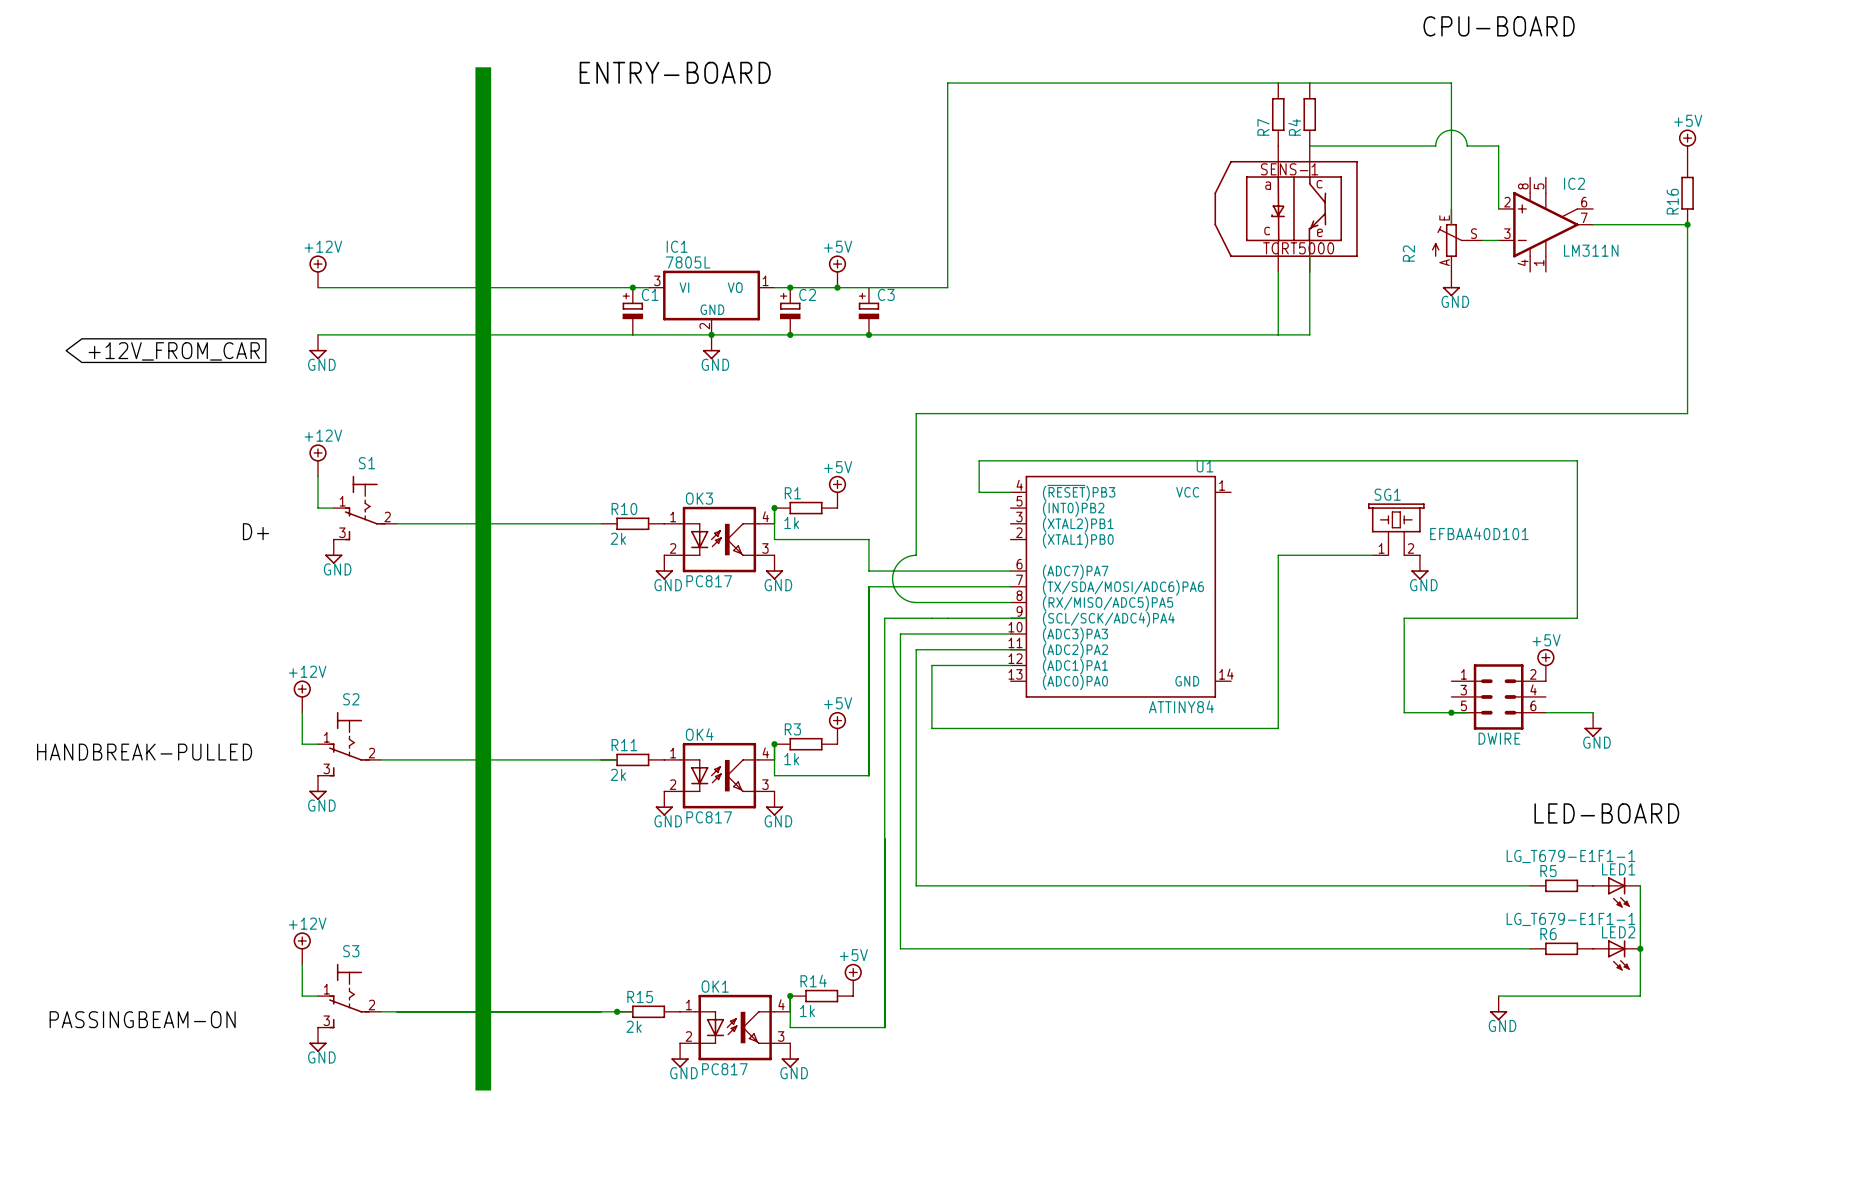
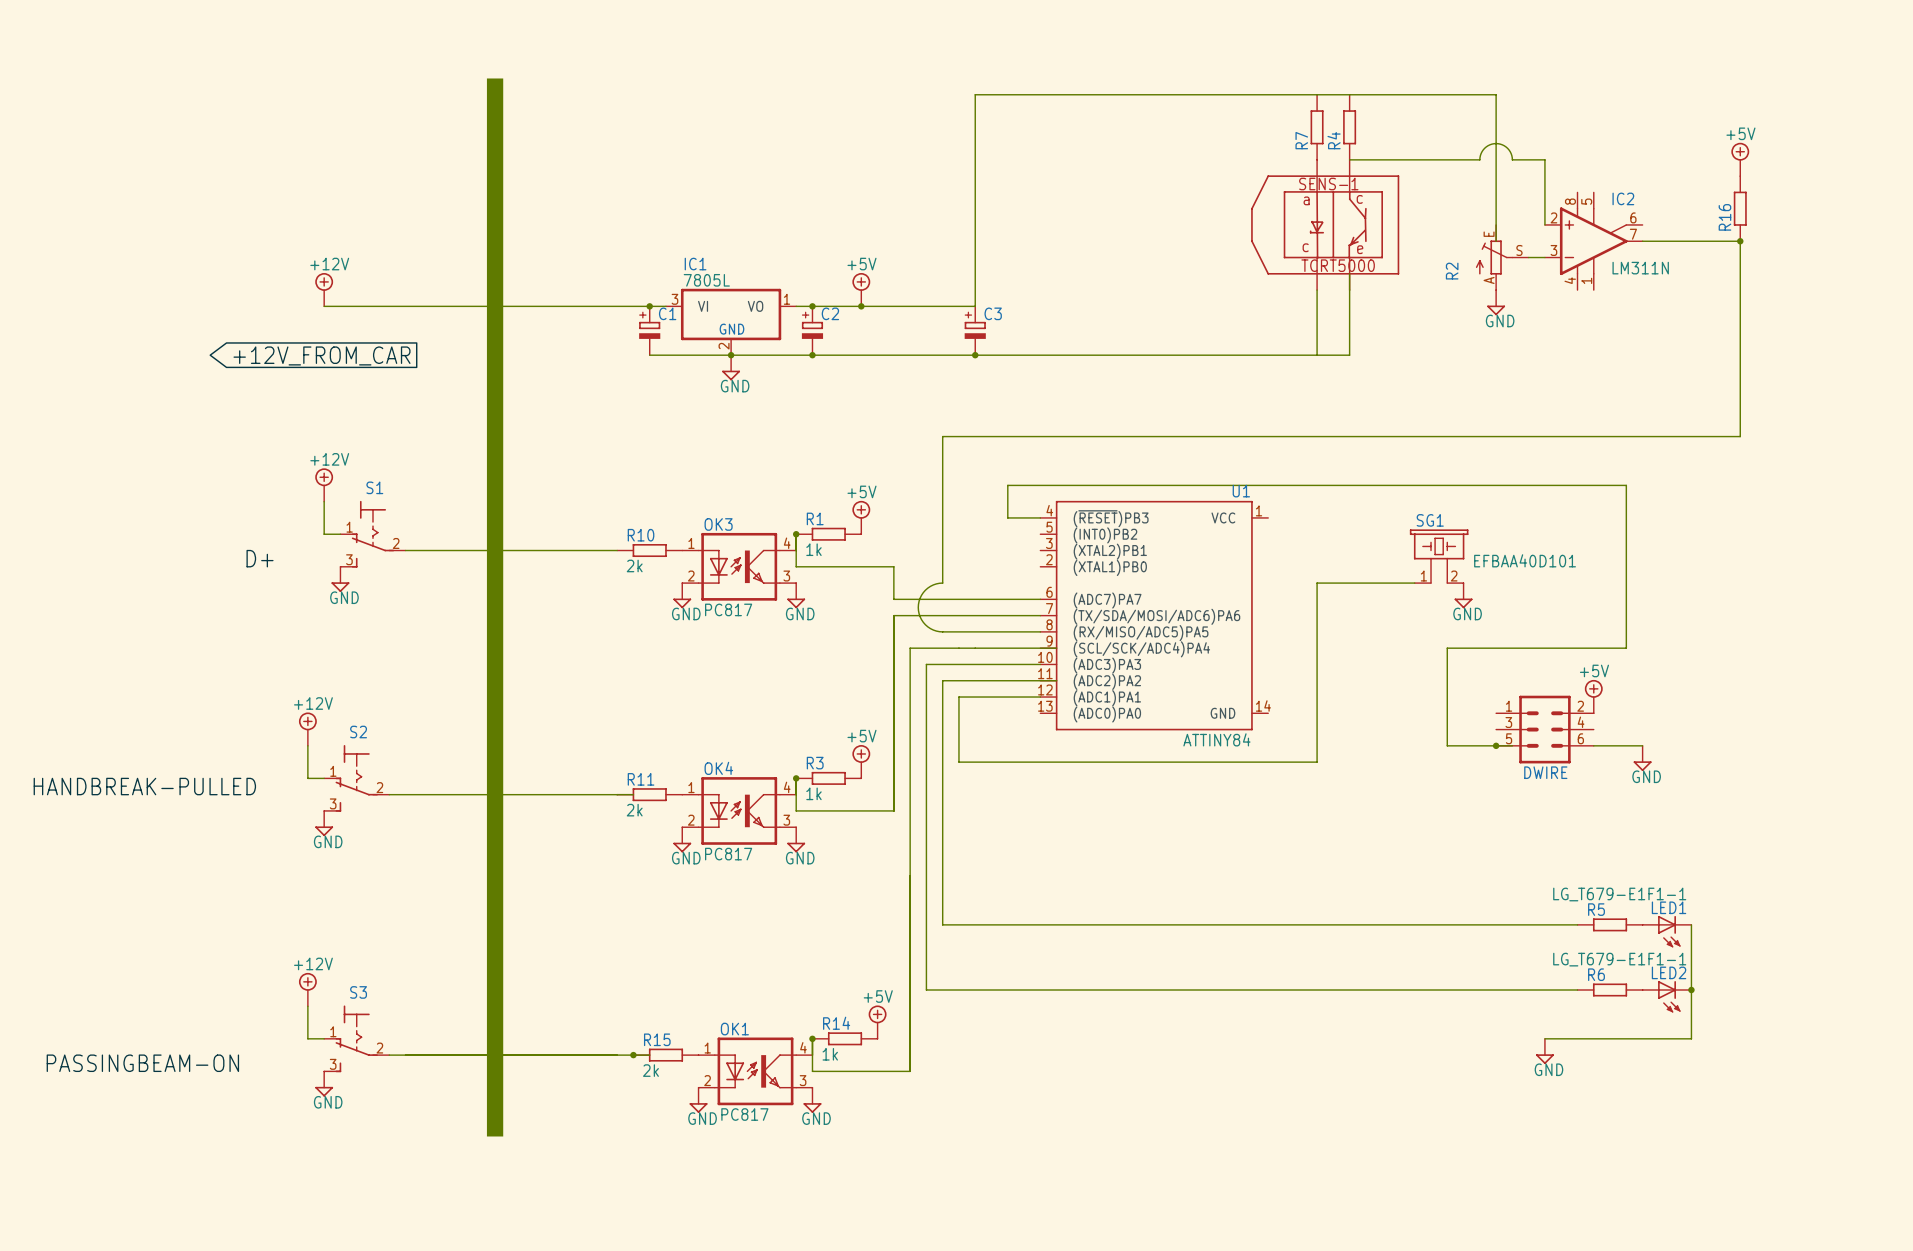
label: CPU-BOARD (1499, 26) -> none
label: ENTRY-BOARD (675, 72) -> none
C3 position: (868, 311) -> (975, 330)
wire: (318, 334) (632, 334) -> none
junction: (868, 334) -> none
junction: none -> (975, 355)
power symbol: GND (318, 347) -> none
global label position: +12V_FROM_CAR (174, 351) -> +12V_FROM_CAR (322, 355)
label: LED-BOARD (1606, 813) -> none

